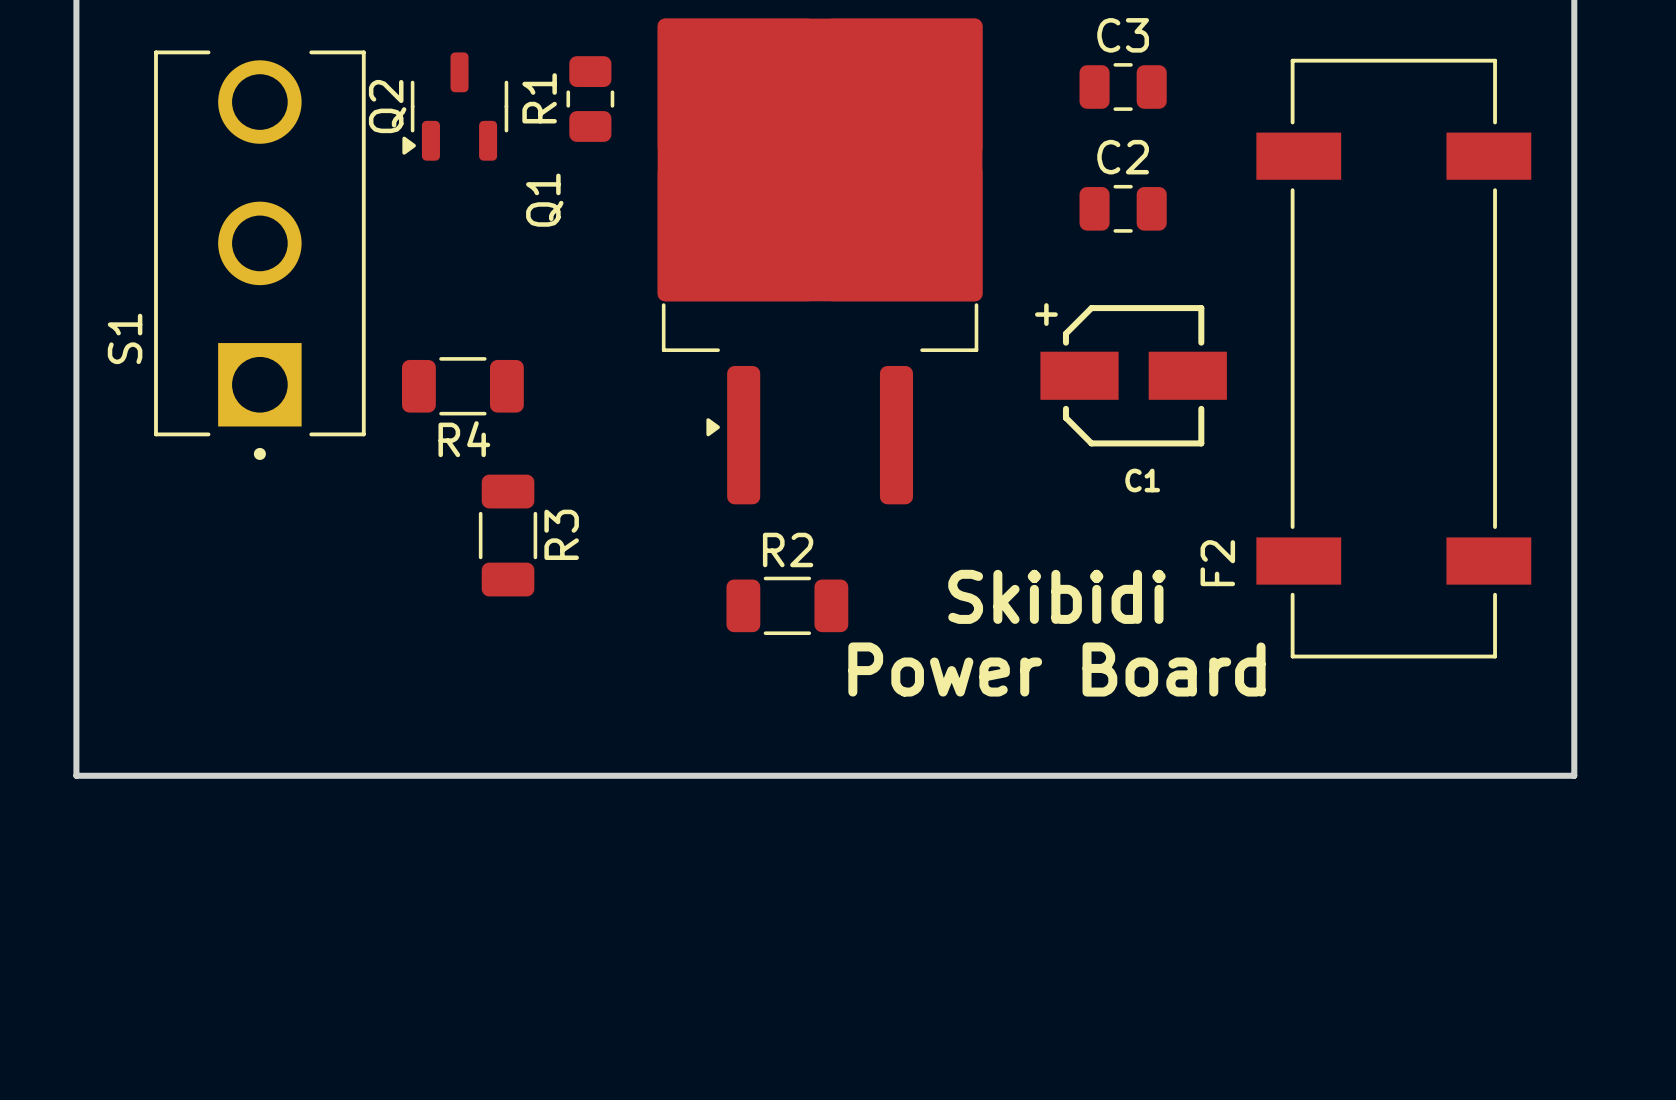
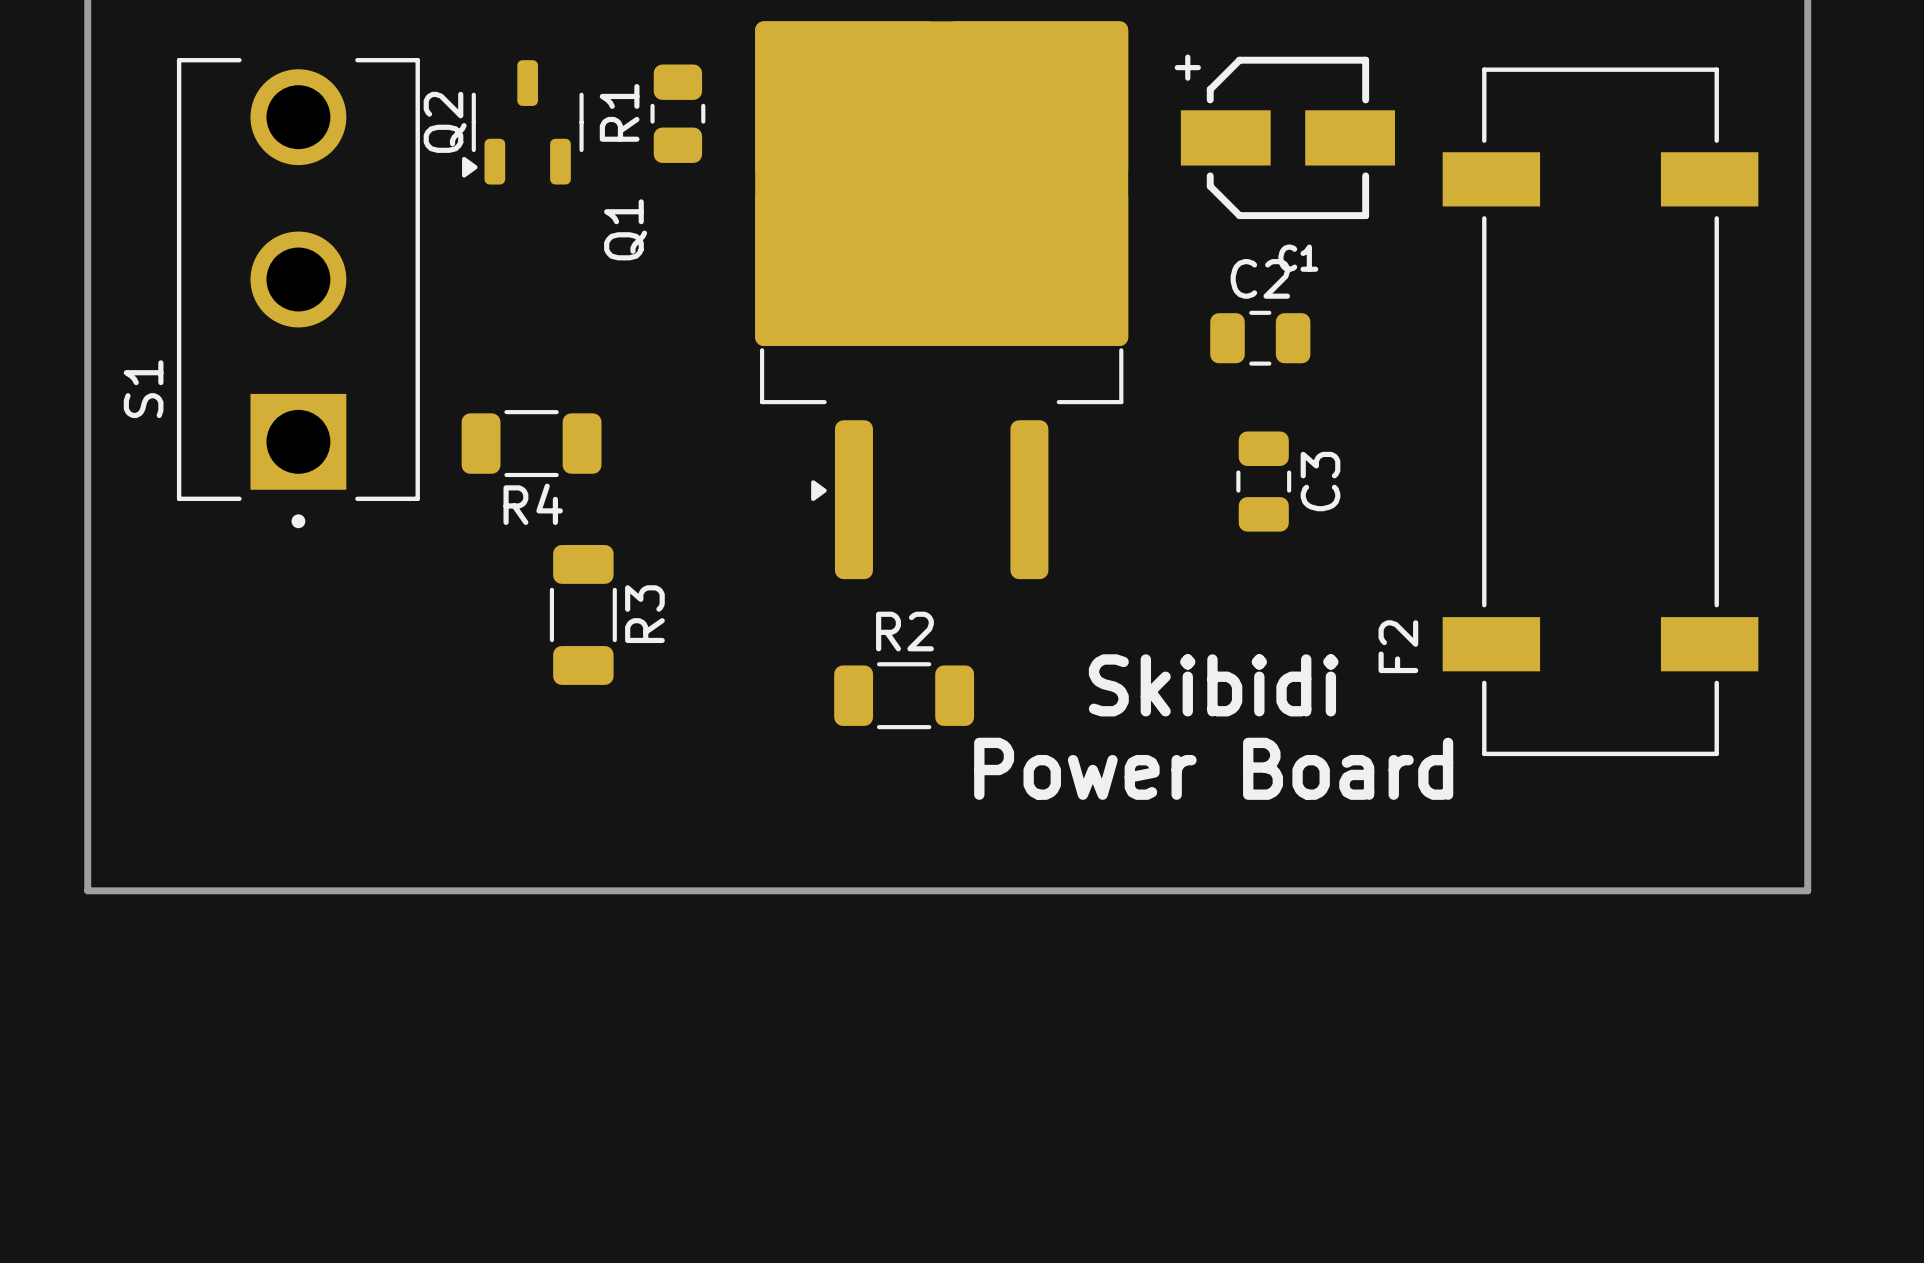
C3 rotation: 0° (1123, 87) -> 90° clockwise (1263, 481)
C3 position: (1123, 87) -> (1263, 481)
C2 position: (1123, 208) -> (1260, 338)
C1 position: (1133, 375) -> (1287, 137)

